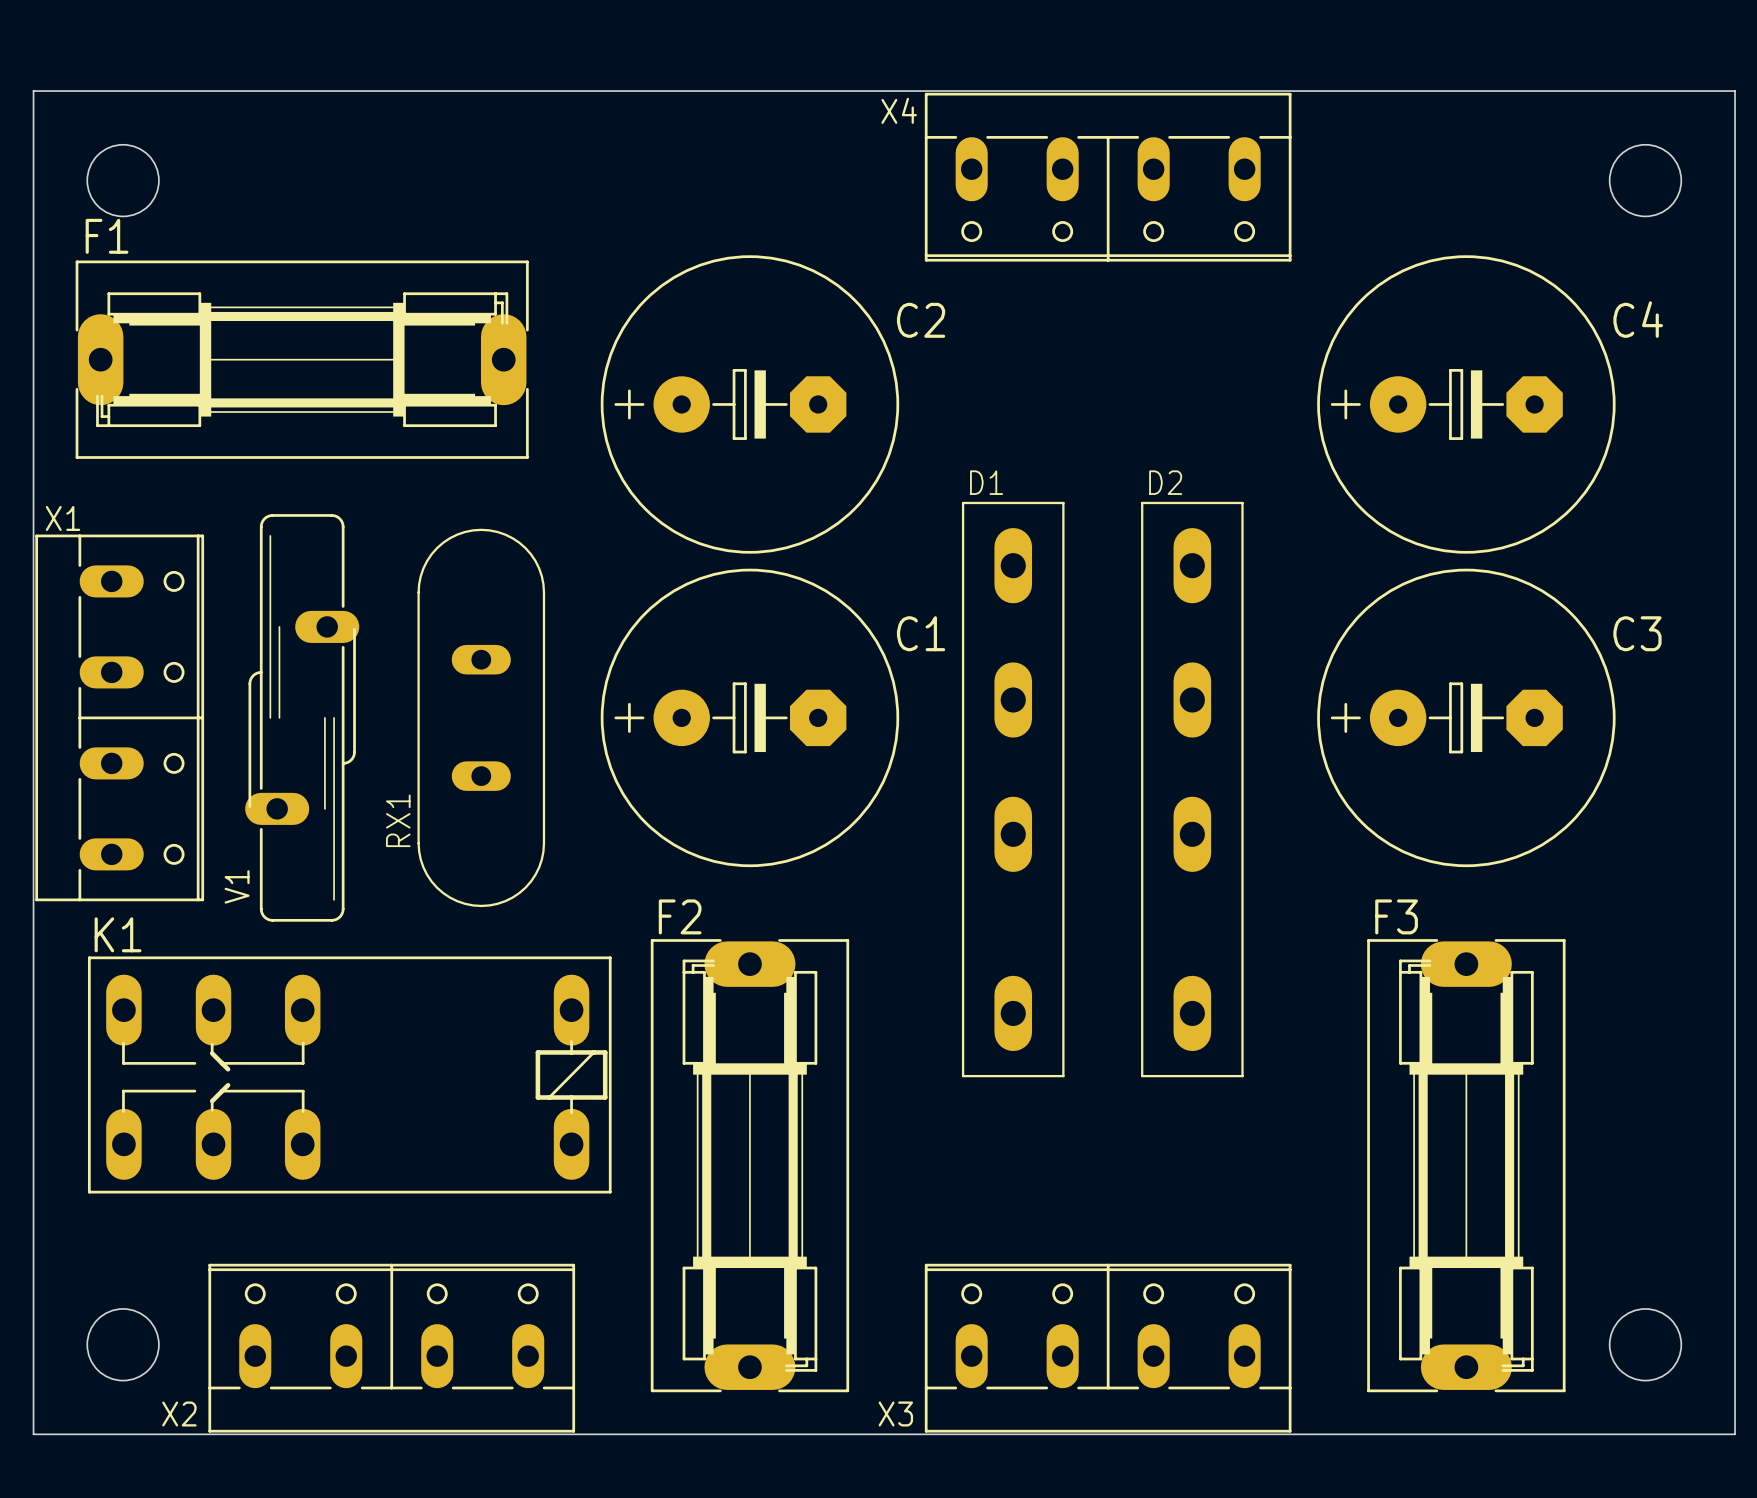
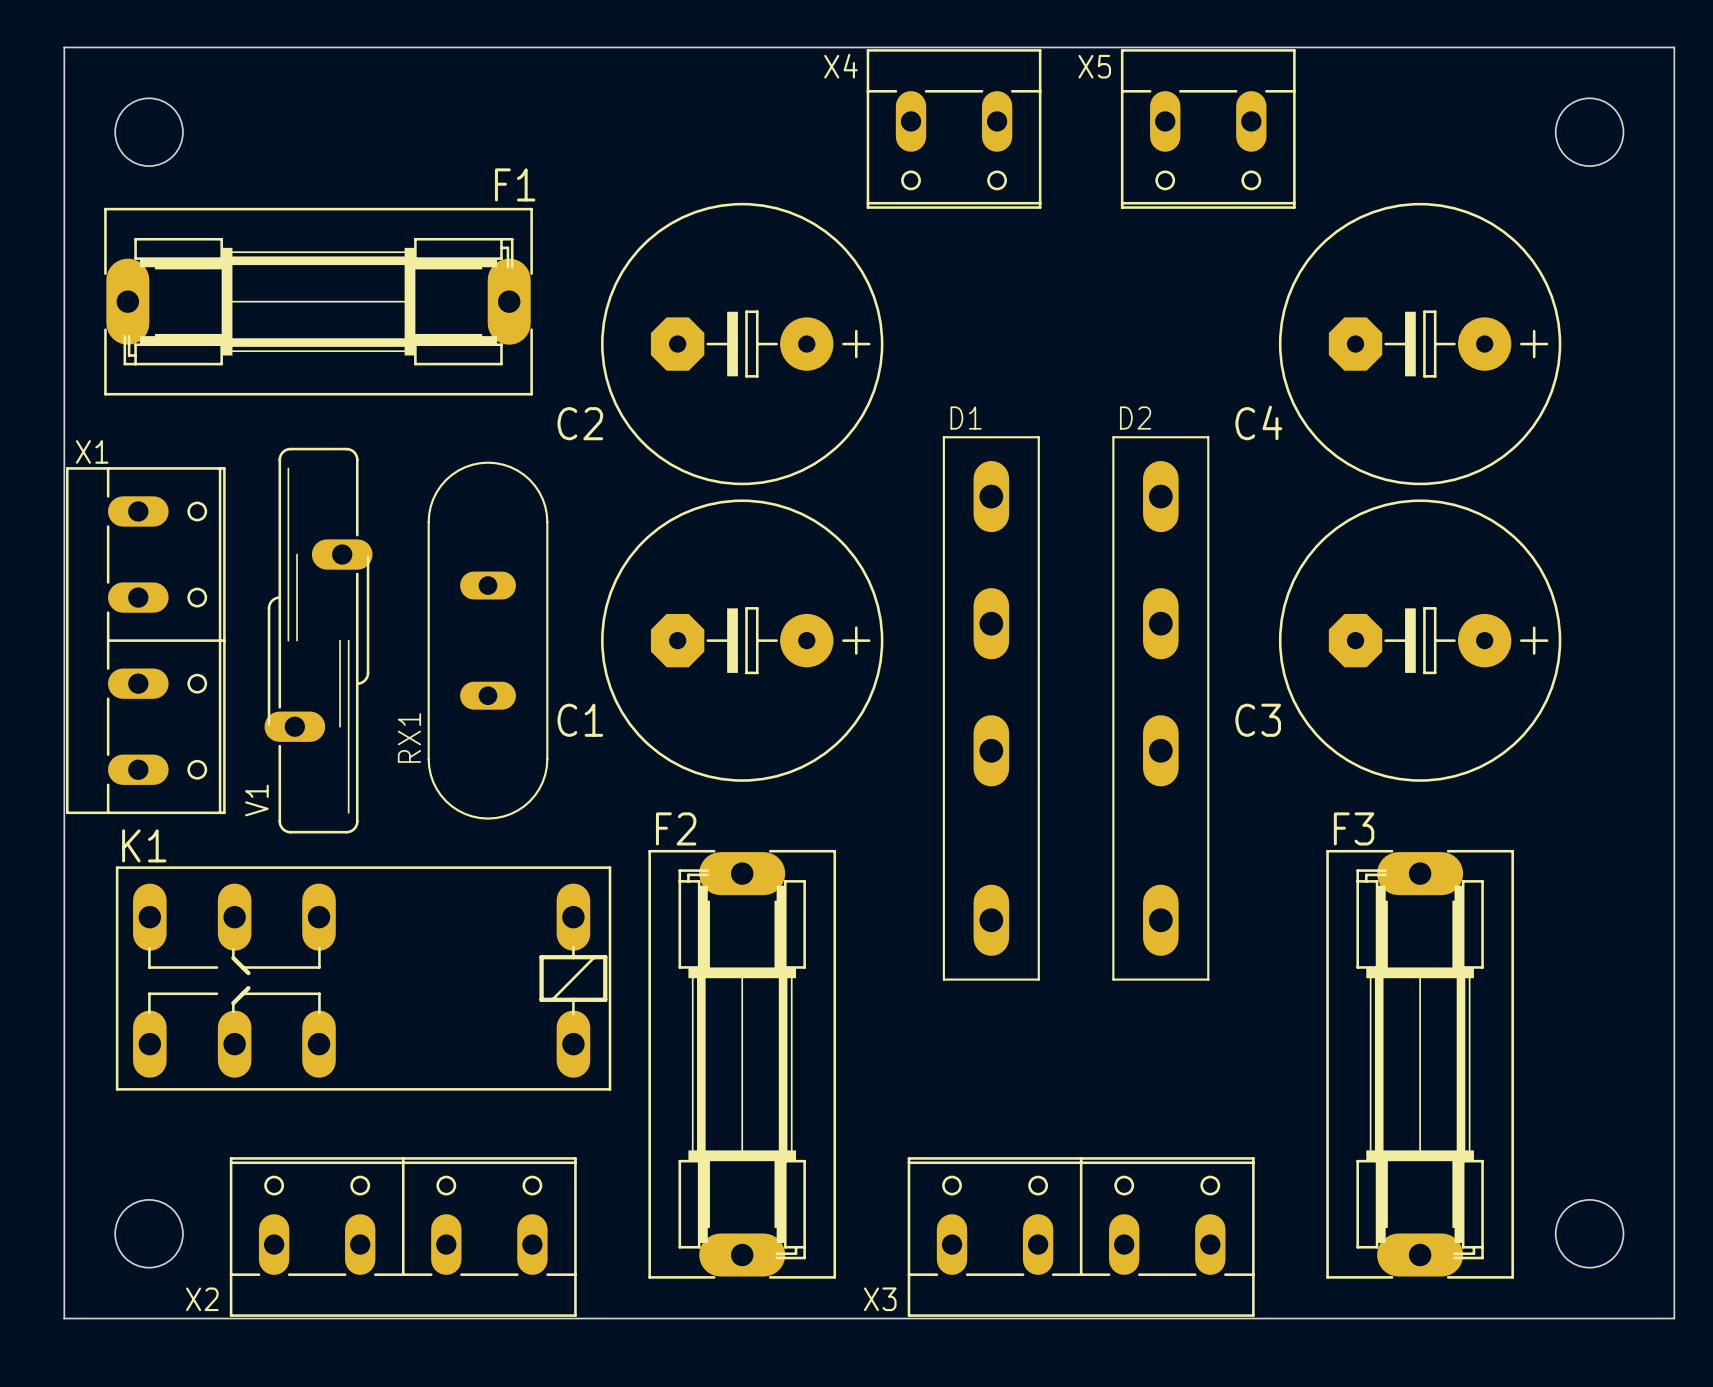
X4 footprint: [924, 92, 1292, 262] -> [866, 49, 1042, 209]
X4 name position: X4 (899, 110) -> X4 (840, 66)
X5: none -> (1208, 128)
F1 name position: F1 (107, 236) -> F1 (515, 184)
C2 rotation: 0° (749, 404) -> 180° (742, 344)
C4 rotation: 0° (1466, 404) -> 180° (1420, 344)
C1 rotation: 0° (749, 717) -> 180° (742, 640)
C3 rotation: 0° (1466, 717) -> 180° (1420, 640)

